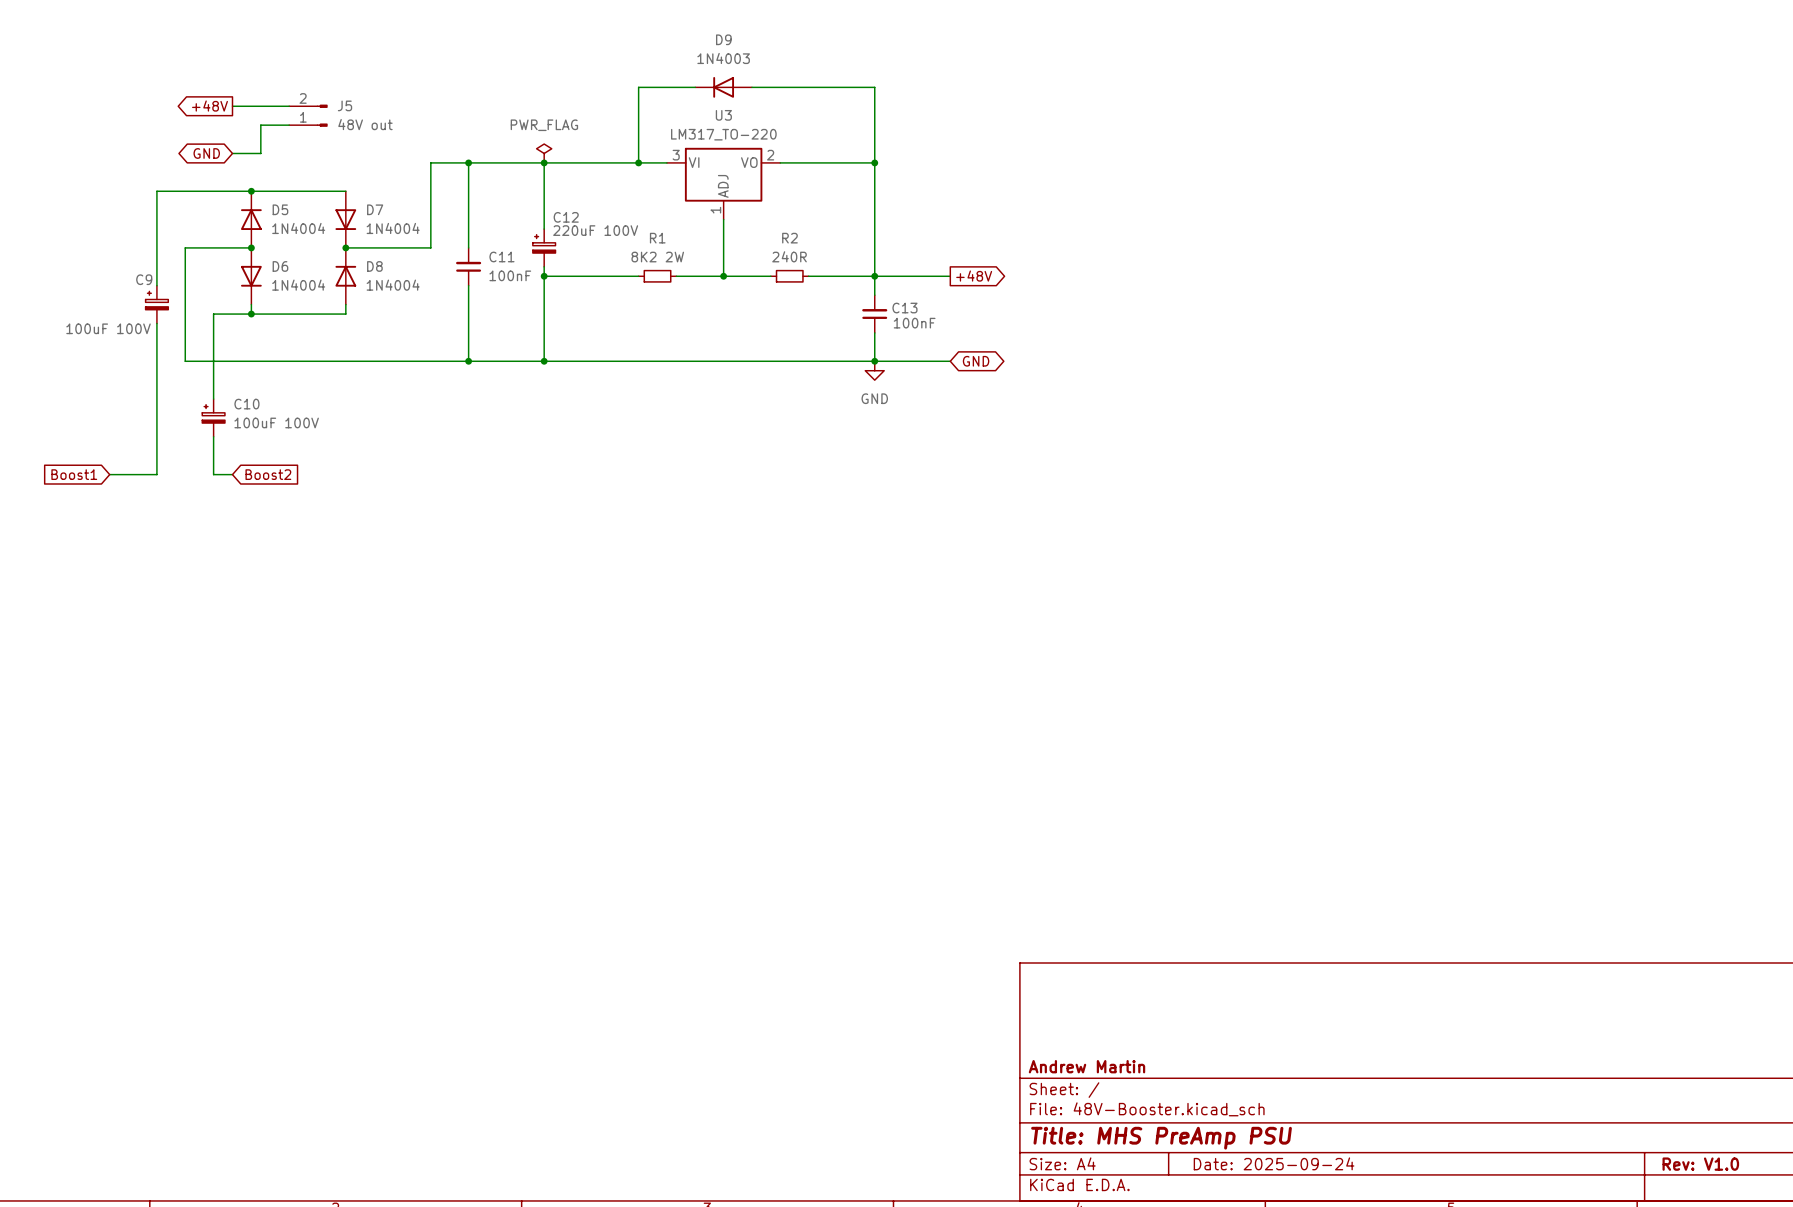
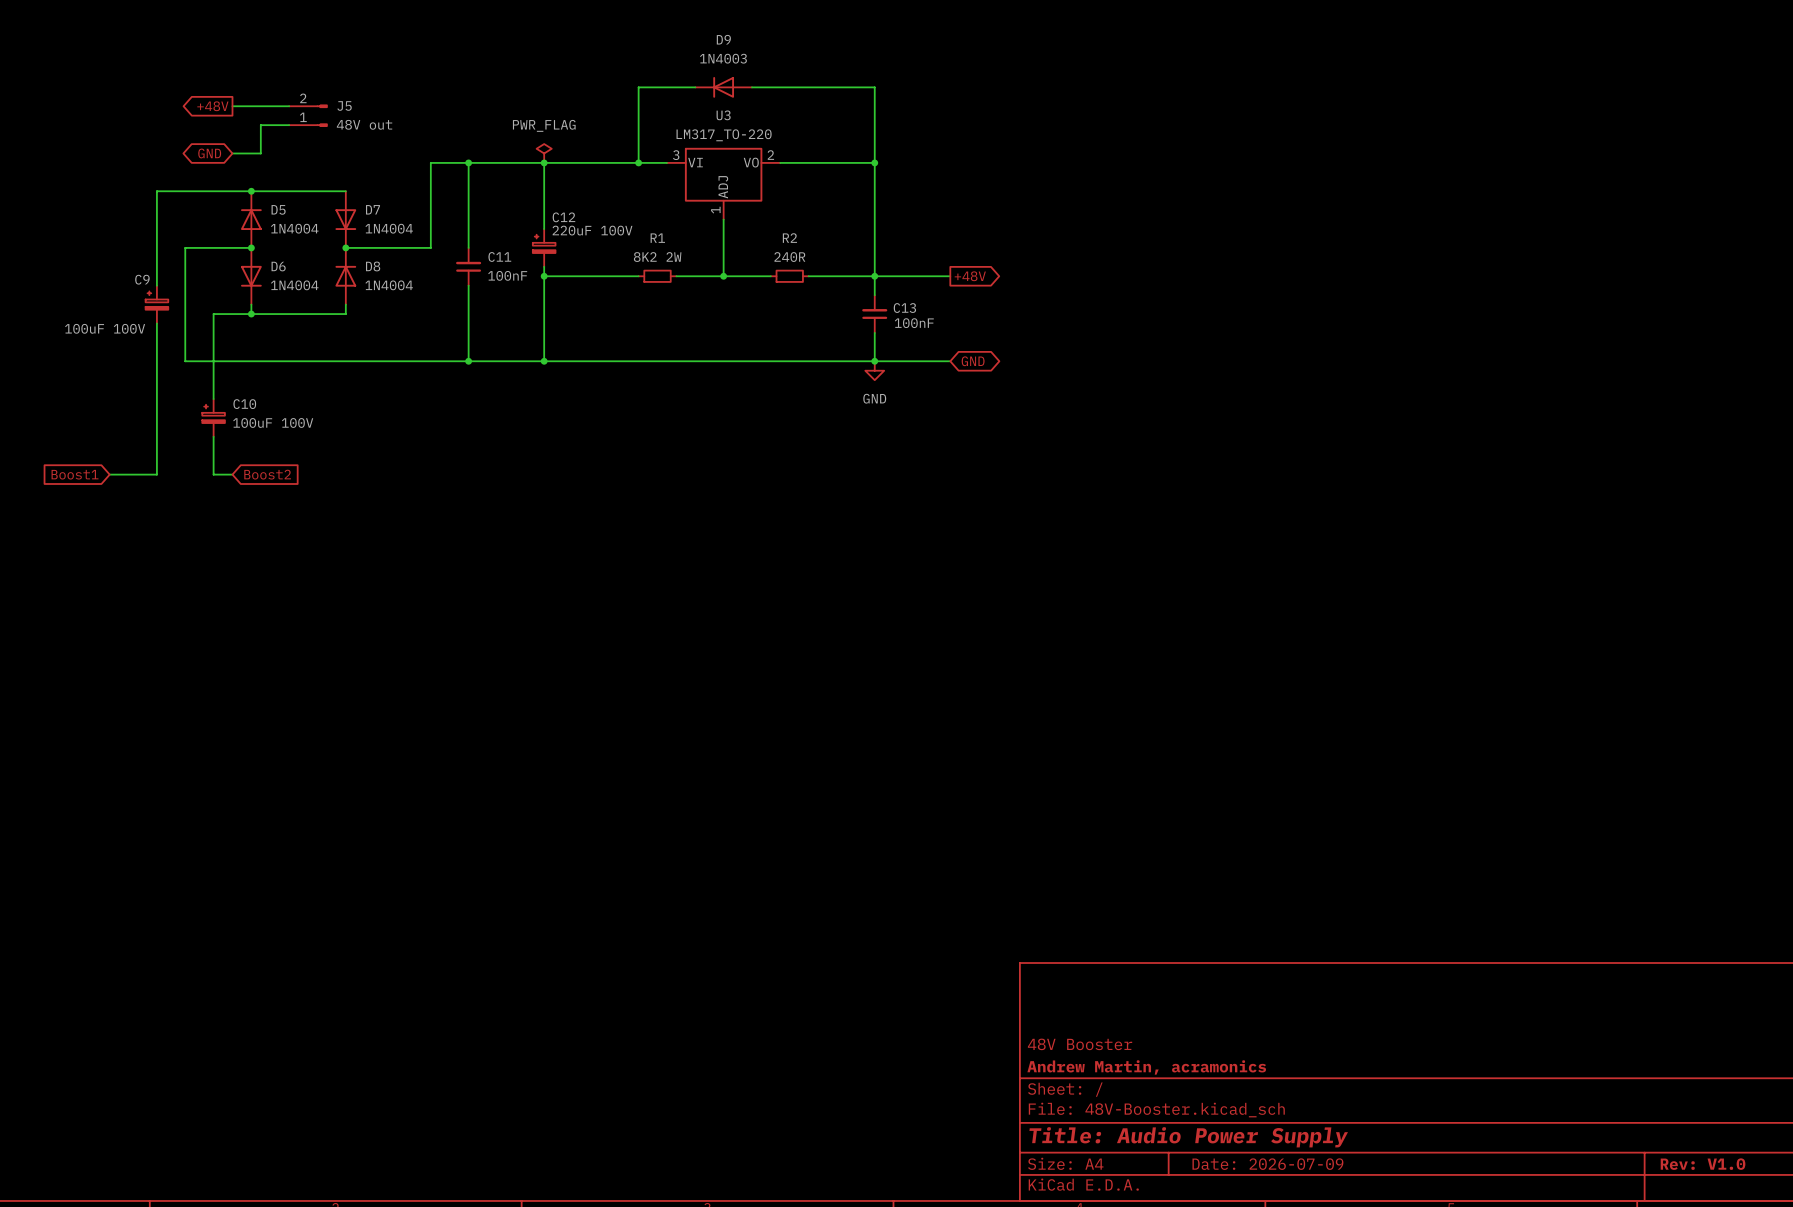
title block: none -> 48V Booster (1080, 1044)
title block: Andrew Martin (1086, 1066) -> Andrew Martin, acramonics (1146, 1067)
title block: Title: MHS PreAmp PSU (1161, 1138) -> Title: Audio Power Supply (1188, 1137)
title block: Date: 2025-09-24 (1274, 1163) -> Date: 2026-07-09 (1267, 1164)

